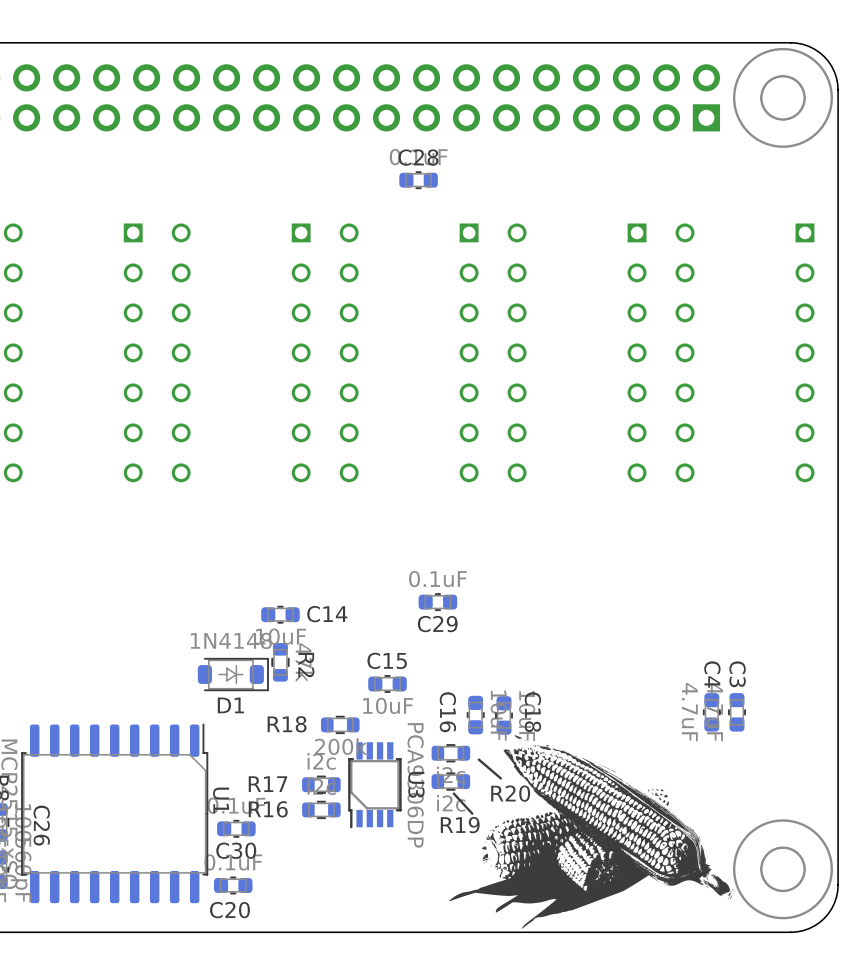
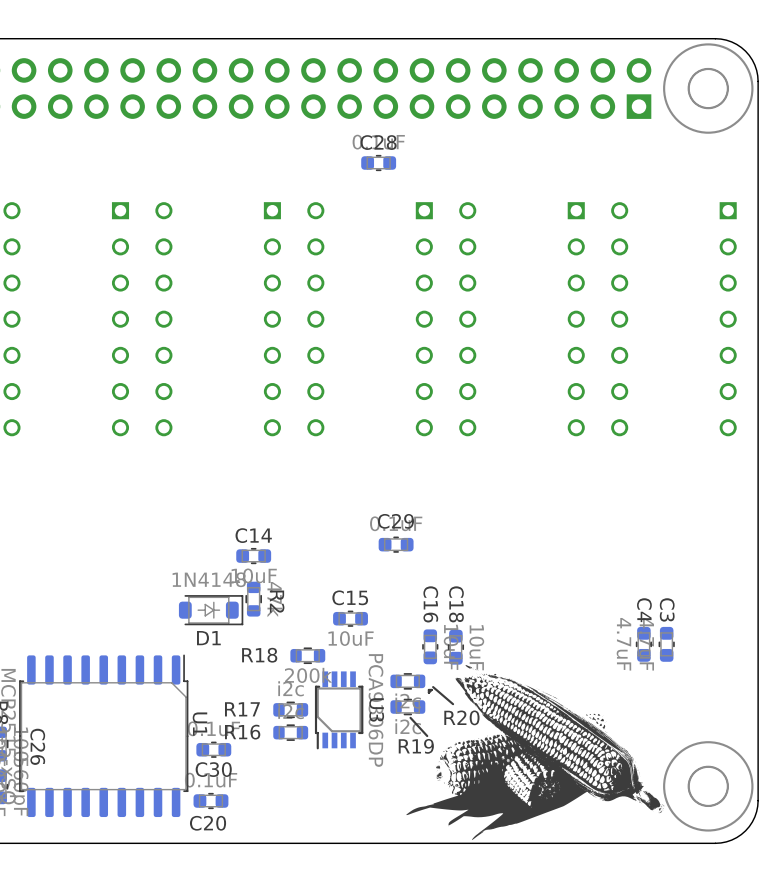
C14 name position: C14 (327, 614) -> C14 (253, 535)
C29 name position: C29 (437, 624) -> C29 (395, 521)
C16 name position: C16 (447, 712) -> C16 (430, 604)
C18 name position: C18 (532, 712) -> C18 (456, 604)
line: none -> (431, 689) (428, 692) (428, 689) (431, 689)

